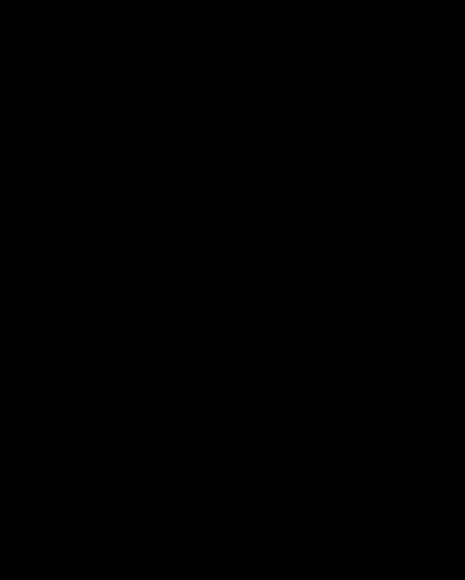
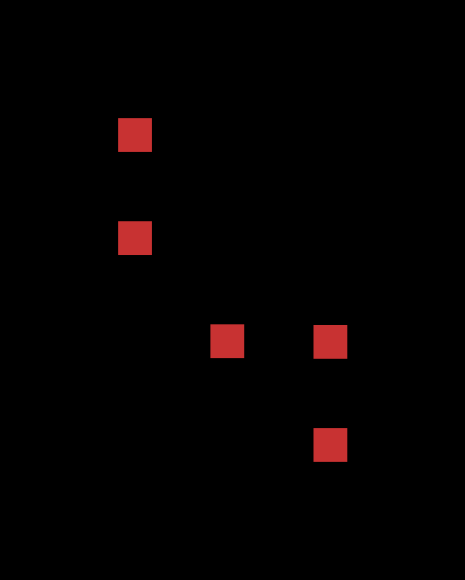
part: none -> (135, 135)
part: none -> (135, 238)
part: none -> (227, 341)
part: none -> (330, 341)
part: none -> (330, 444)

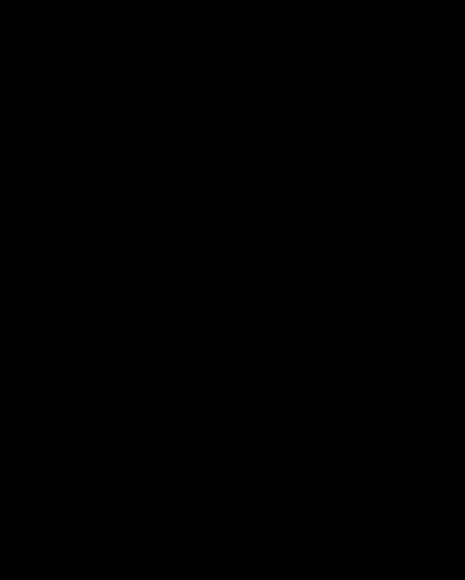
part: (135, 135) -> none
part: (135, 238) -> none
part: (227, 341) -> none
part: (330, 341) -> none
part: (330, 444) -> none

